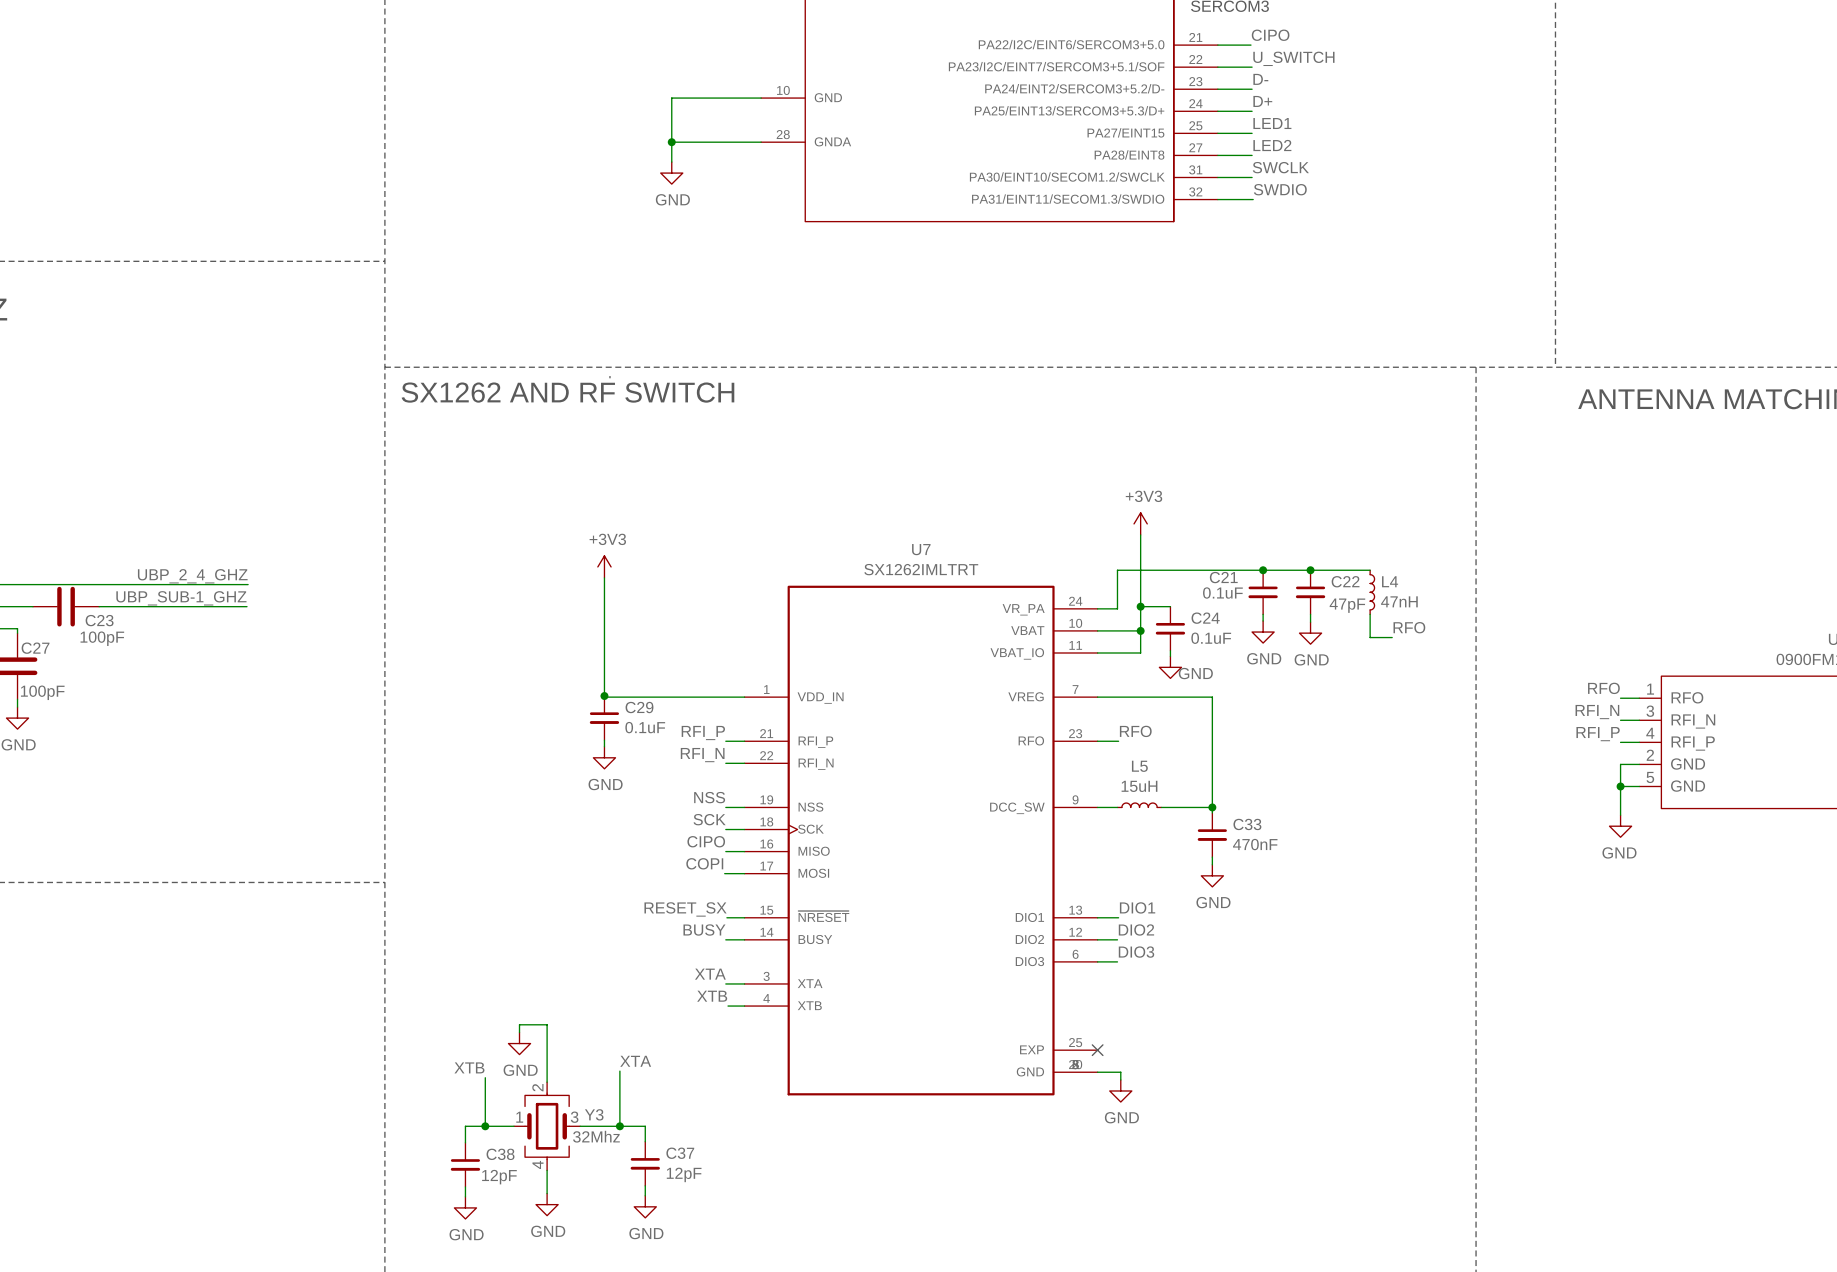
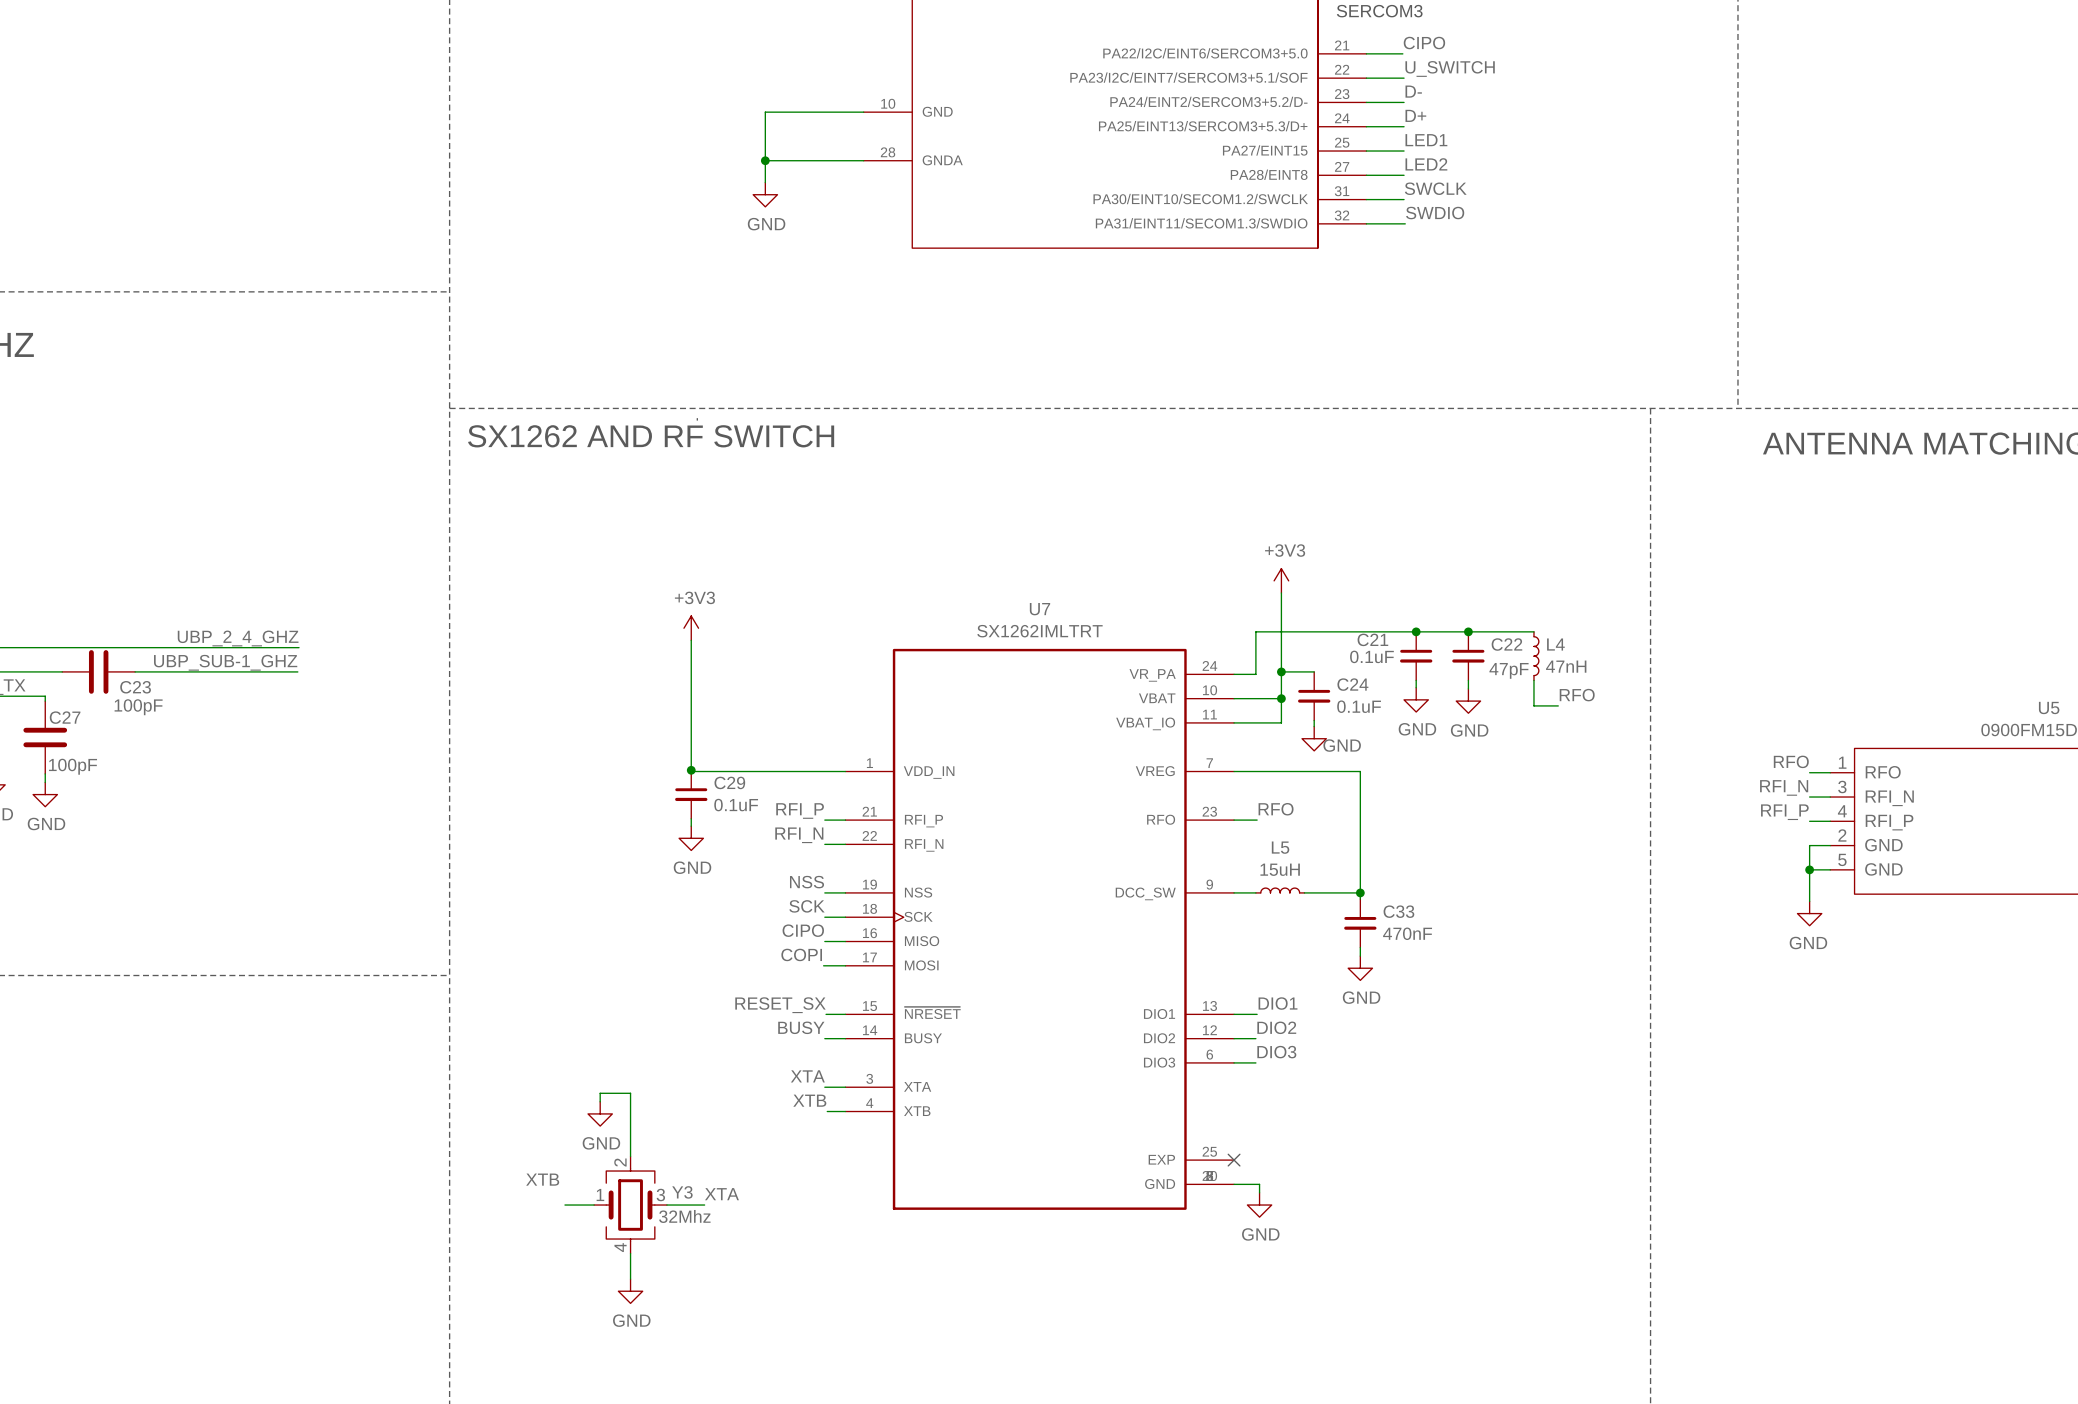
wire: (519, 1032) (519, 1024) (547, 1024) (547, 1082) -> (600, 1101) (600, 1093) (630, 1093) (630, 1156)
power symbol position: GND (519, 1043) -> GND (600, 1113)
label position: XTA (635, 1061) -> XTA (721, 1194)
wire: (619, 1071) (619, 1126) -> none
wire: (485, 1077) (485, 1126) -> none
wire: none -> (564, 1205) (594, 1205)
wire: none -> (666, 1205) (704, 1205)
junction: (485, 1126) -> none
wire: (513, 1126) (465, 1126) (465, 1142) -> none
Y3 position: (547, 1126) -> (630, 1205)
wire: (580, 1126) (645, 1126) (645, 1141) -> none
junction: (619, 1126) -> none
C37: 12pF (645, 1163) -> none
C38: 12pF (465, 1164) -> none
wire: (547, 1170) (547, 1193) -> (630, 1253) (630, 1279)
wire: (645, 1185) (645, 1195) -> none
wire: (465, 1186) (465, 1196) -> none
power symbol position: GND (547, 1204) -> GND (630, 1291)
power symbol: GND (645, 1206) -> none
power symbol: GND (465, 1207) -> none

